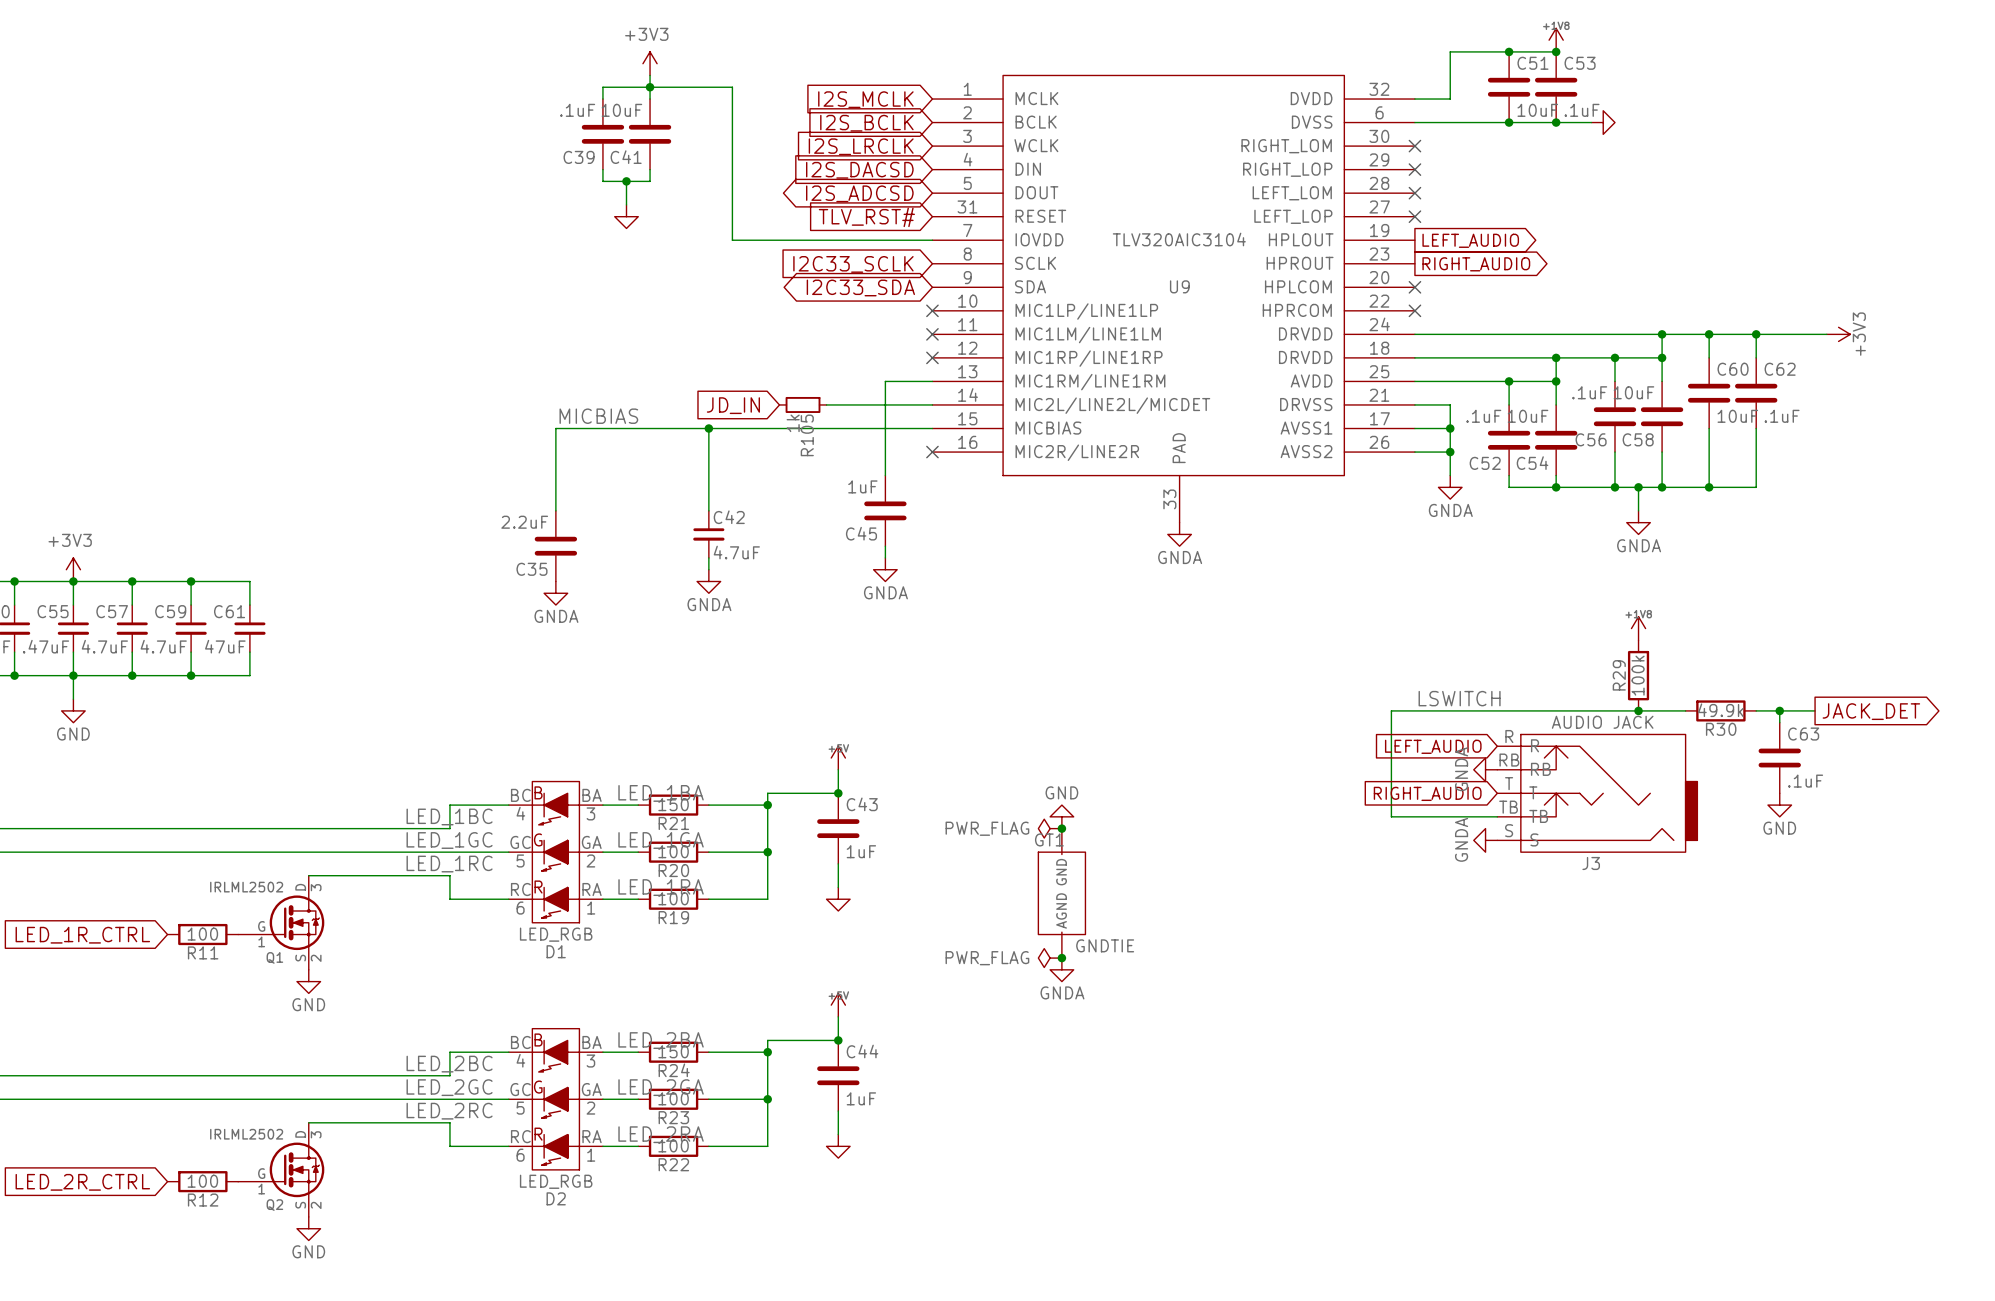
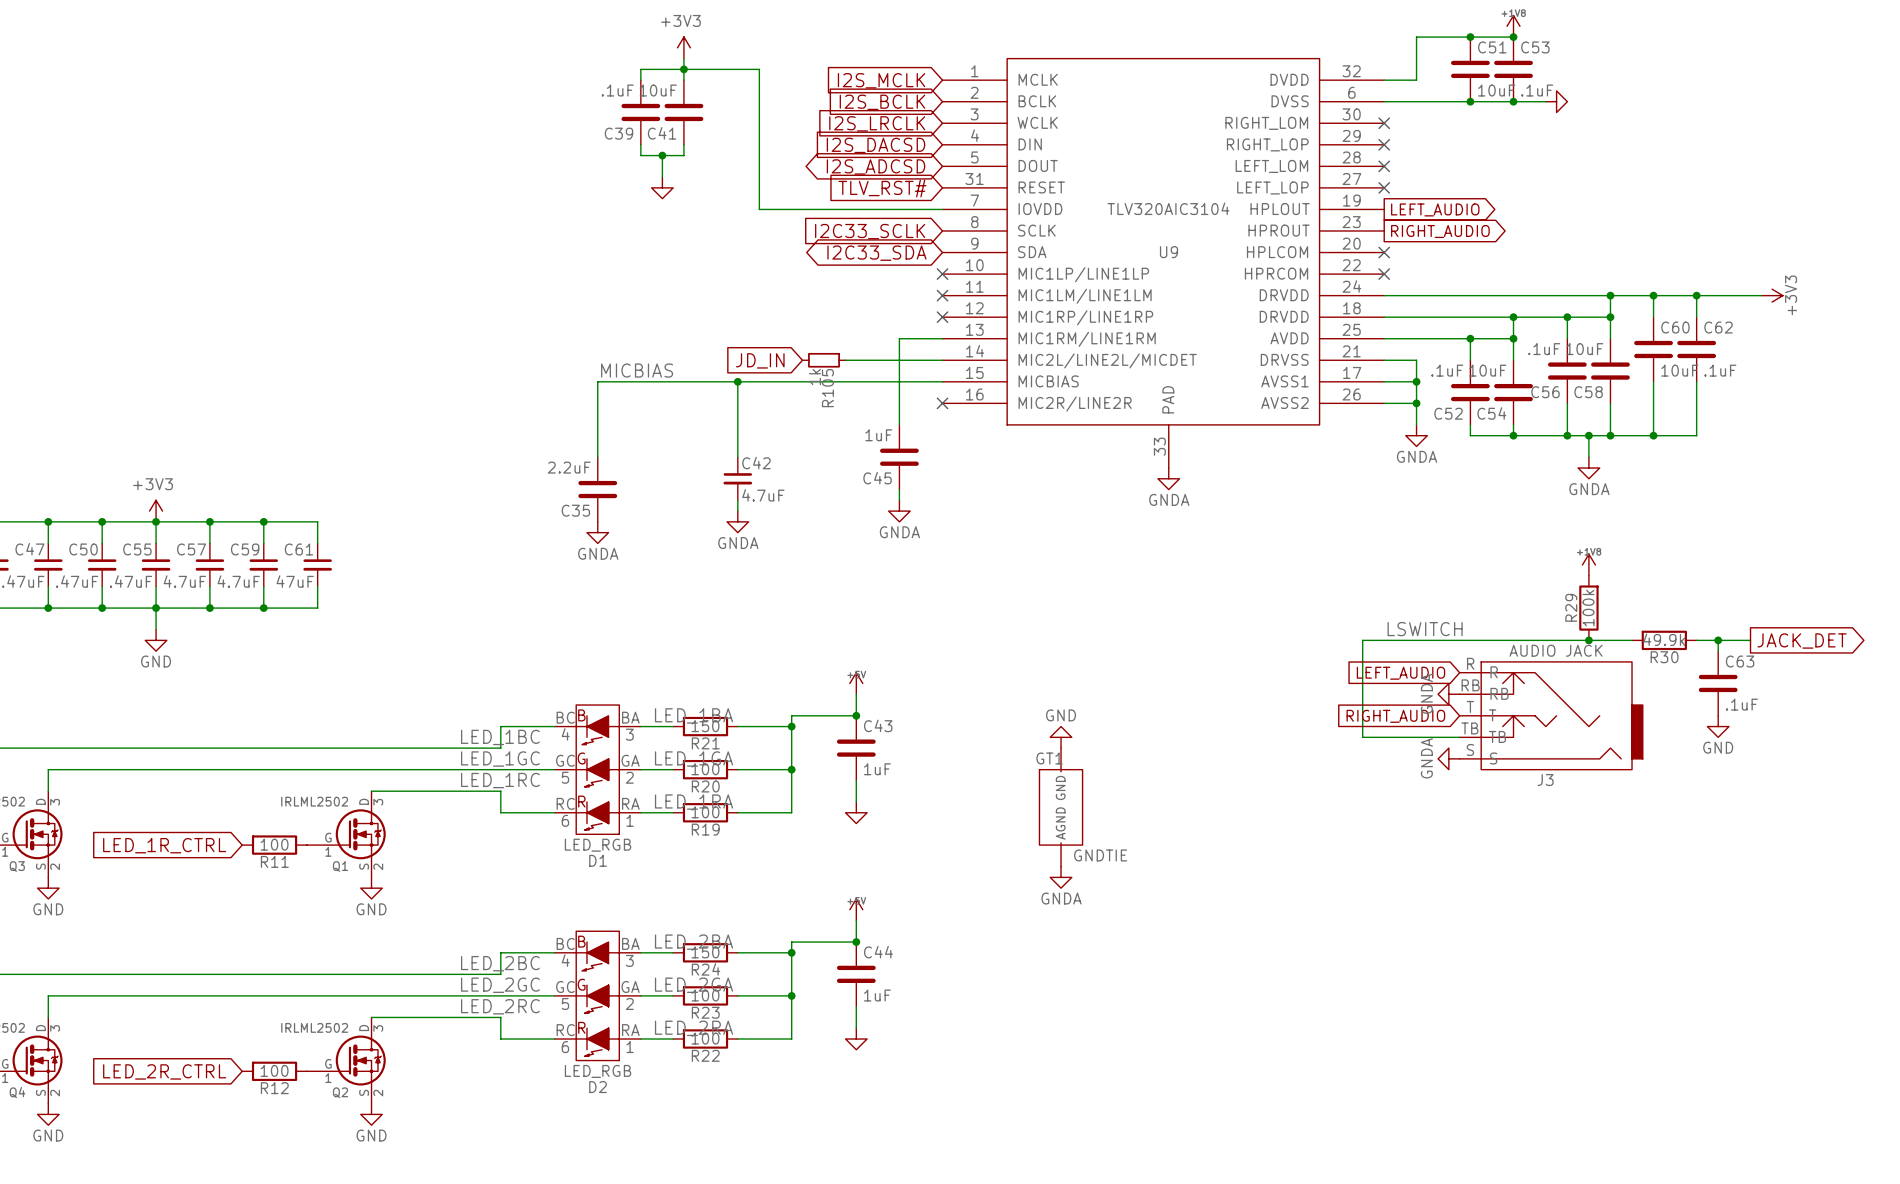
power symbol: PWR_FLAG (1050, 828) -> none
junction: (1061, 828) -> none
power symbol: PWR_FLAG (1050, 958) -> none
junction: (1061, 958) -> none

